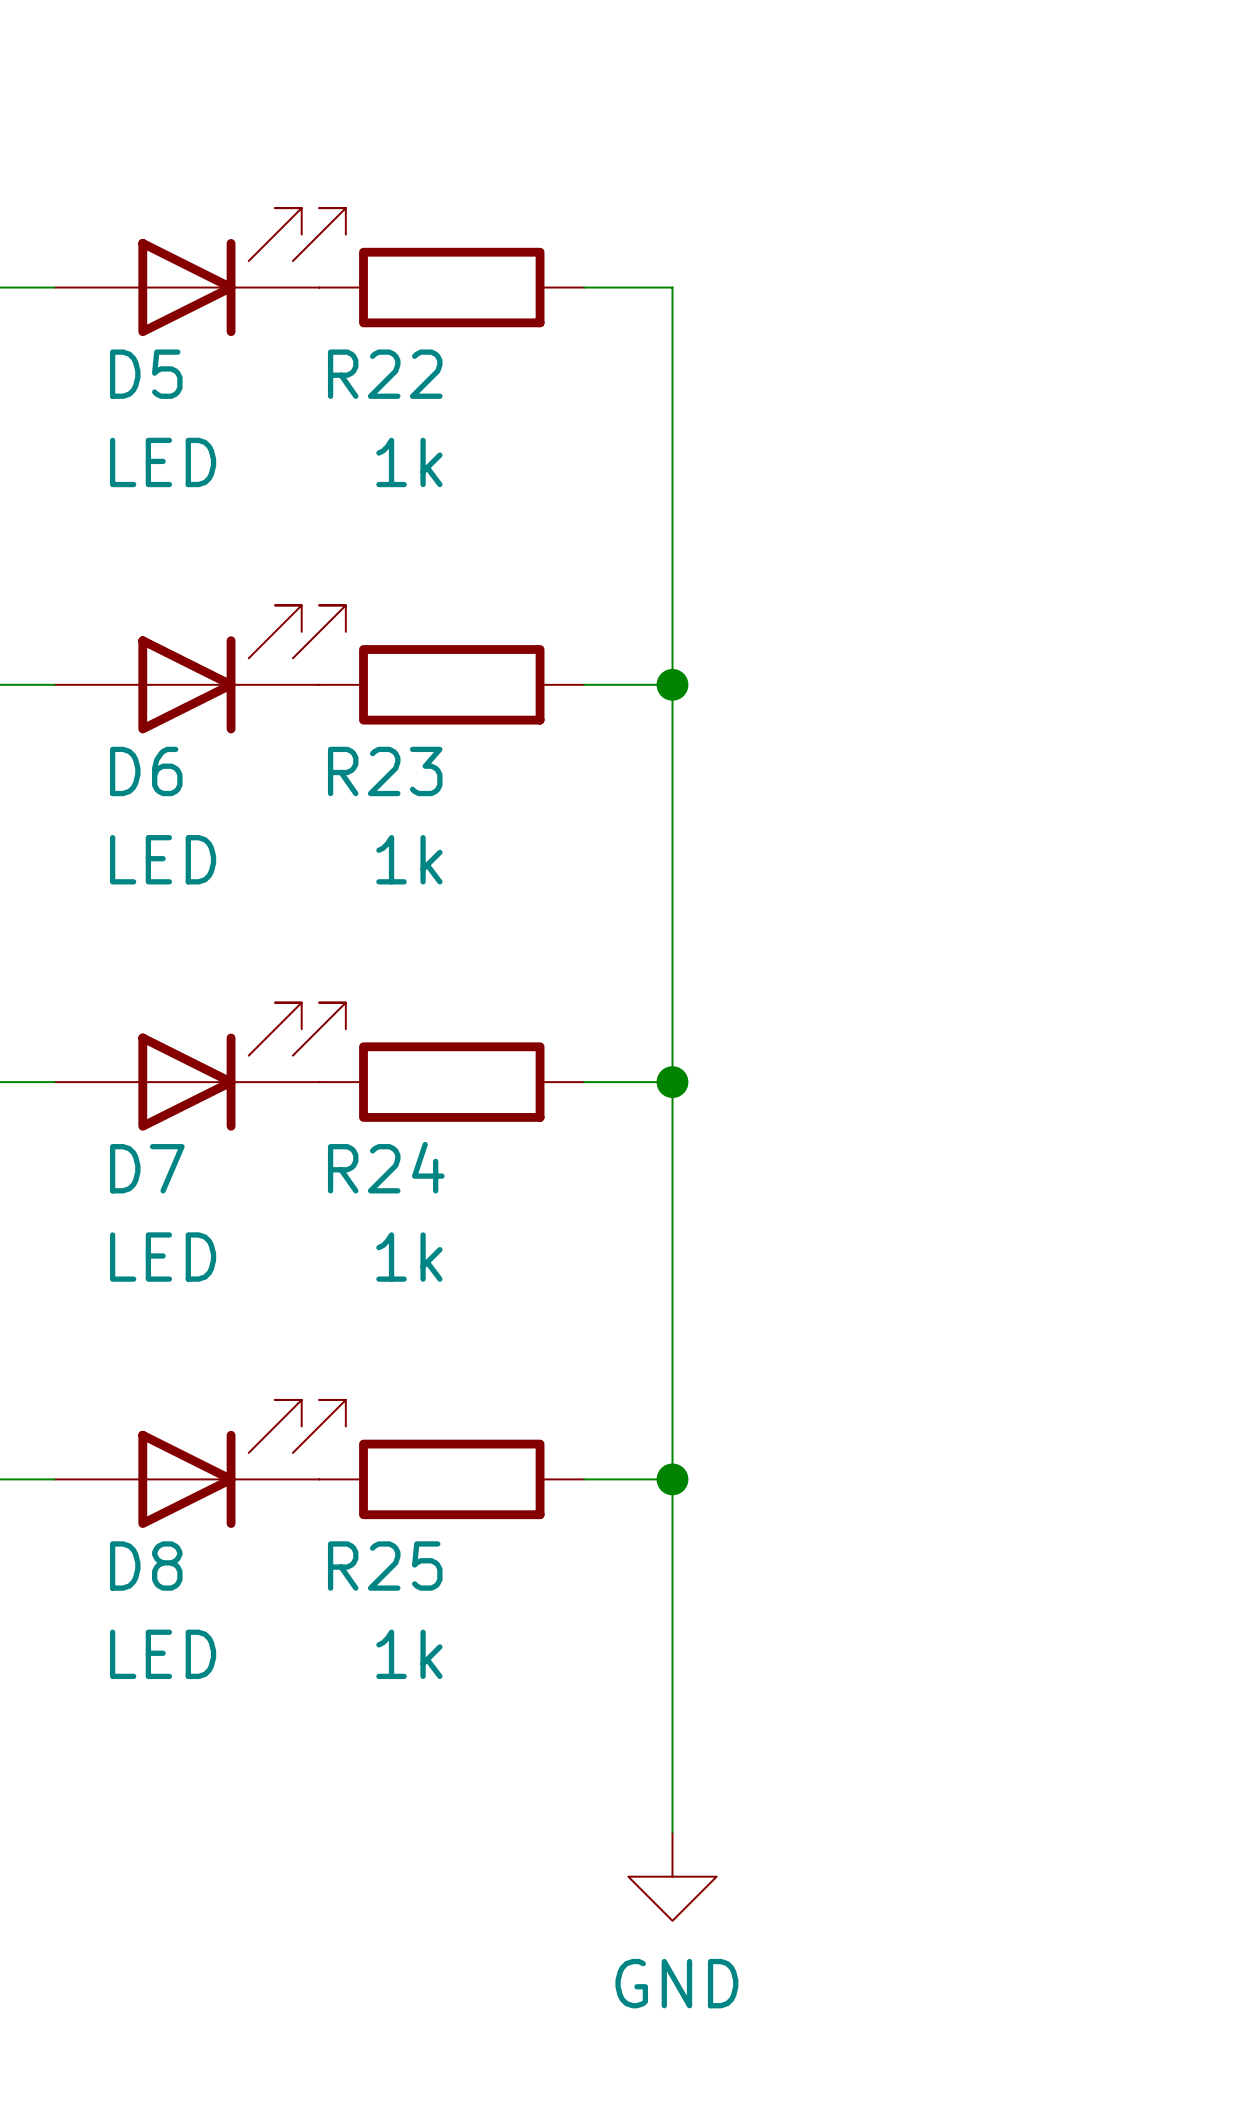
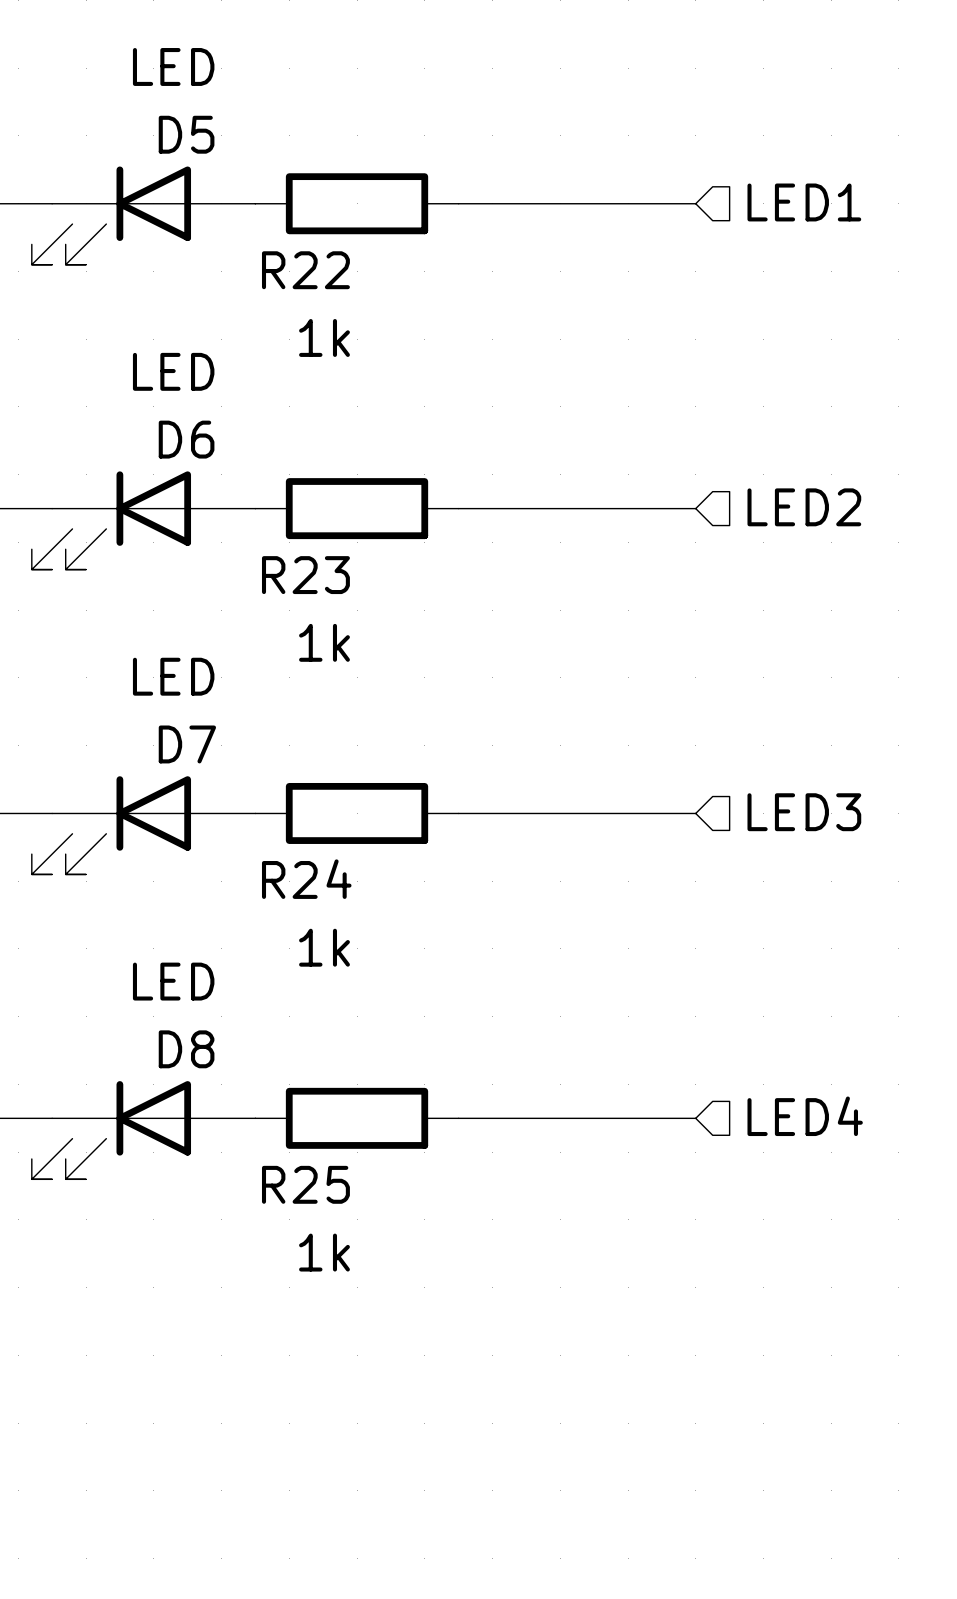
D5 rotation: 0° (242, 272) -> 180° (111, 215)
hierarchical label: none -> LED1 (804, 202)
wire: (672, 287) (672, 1832) -> (526, 203) (695, 203)
D6 rotation: 0° (242, 669) -> 180° (111, 520)
hierarchical label: none -> LED2 (804, 507)
wire: none -> (526, 508) (695, 508)
junction: (672, 684) -> none
D7 rotation: 0° (242, 1066) -> 180° (111, 825)
hierarchical label: none -> LED3 (804, 812)
wire: none -> (526, 813) (695, 813)
junction: (672, 1082) -> none
D8 rotation: 0° (242, 1463) -> 180° (111, 1130)
hierarchical label: none -> LED4 (805, 1116)
wire: none -> (526, 1118) (695, 1118)
junction: (672, 1479) -> none
power symbol: GND (672, 1876) -> none

